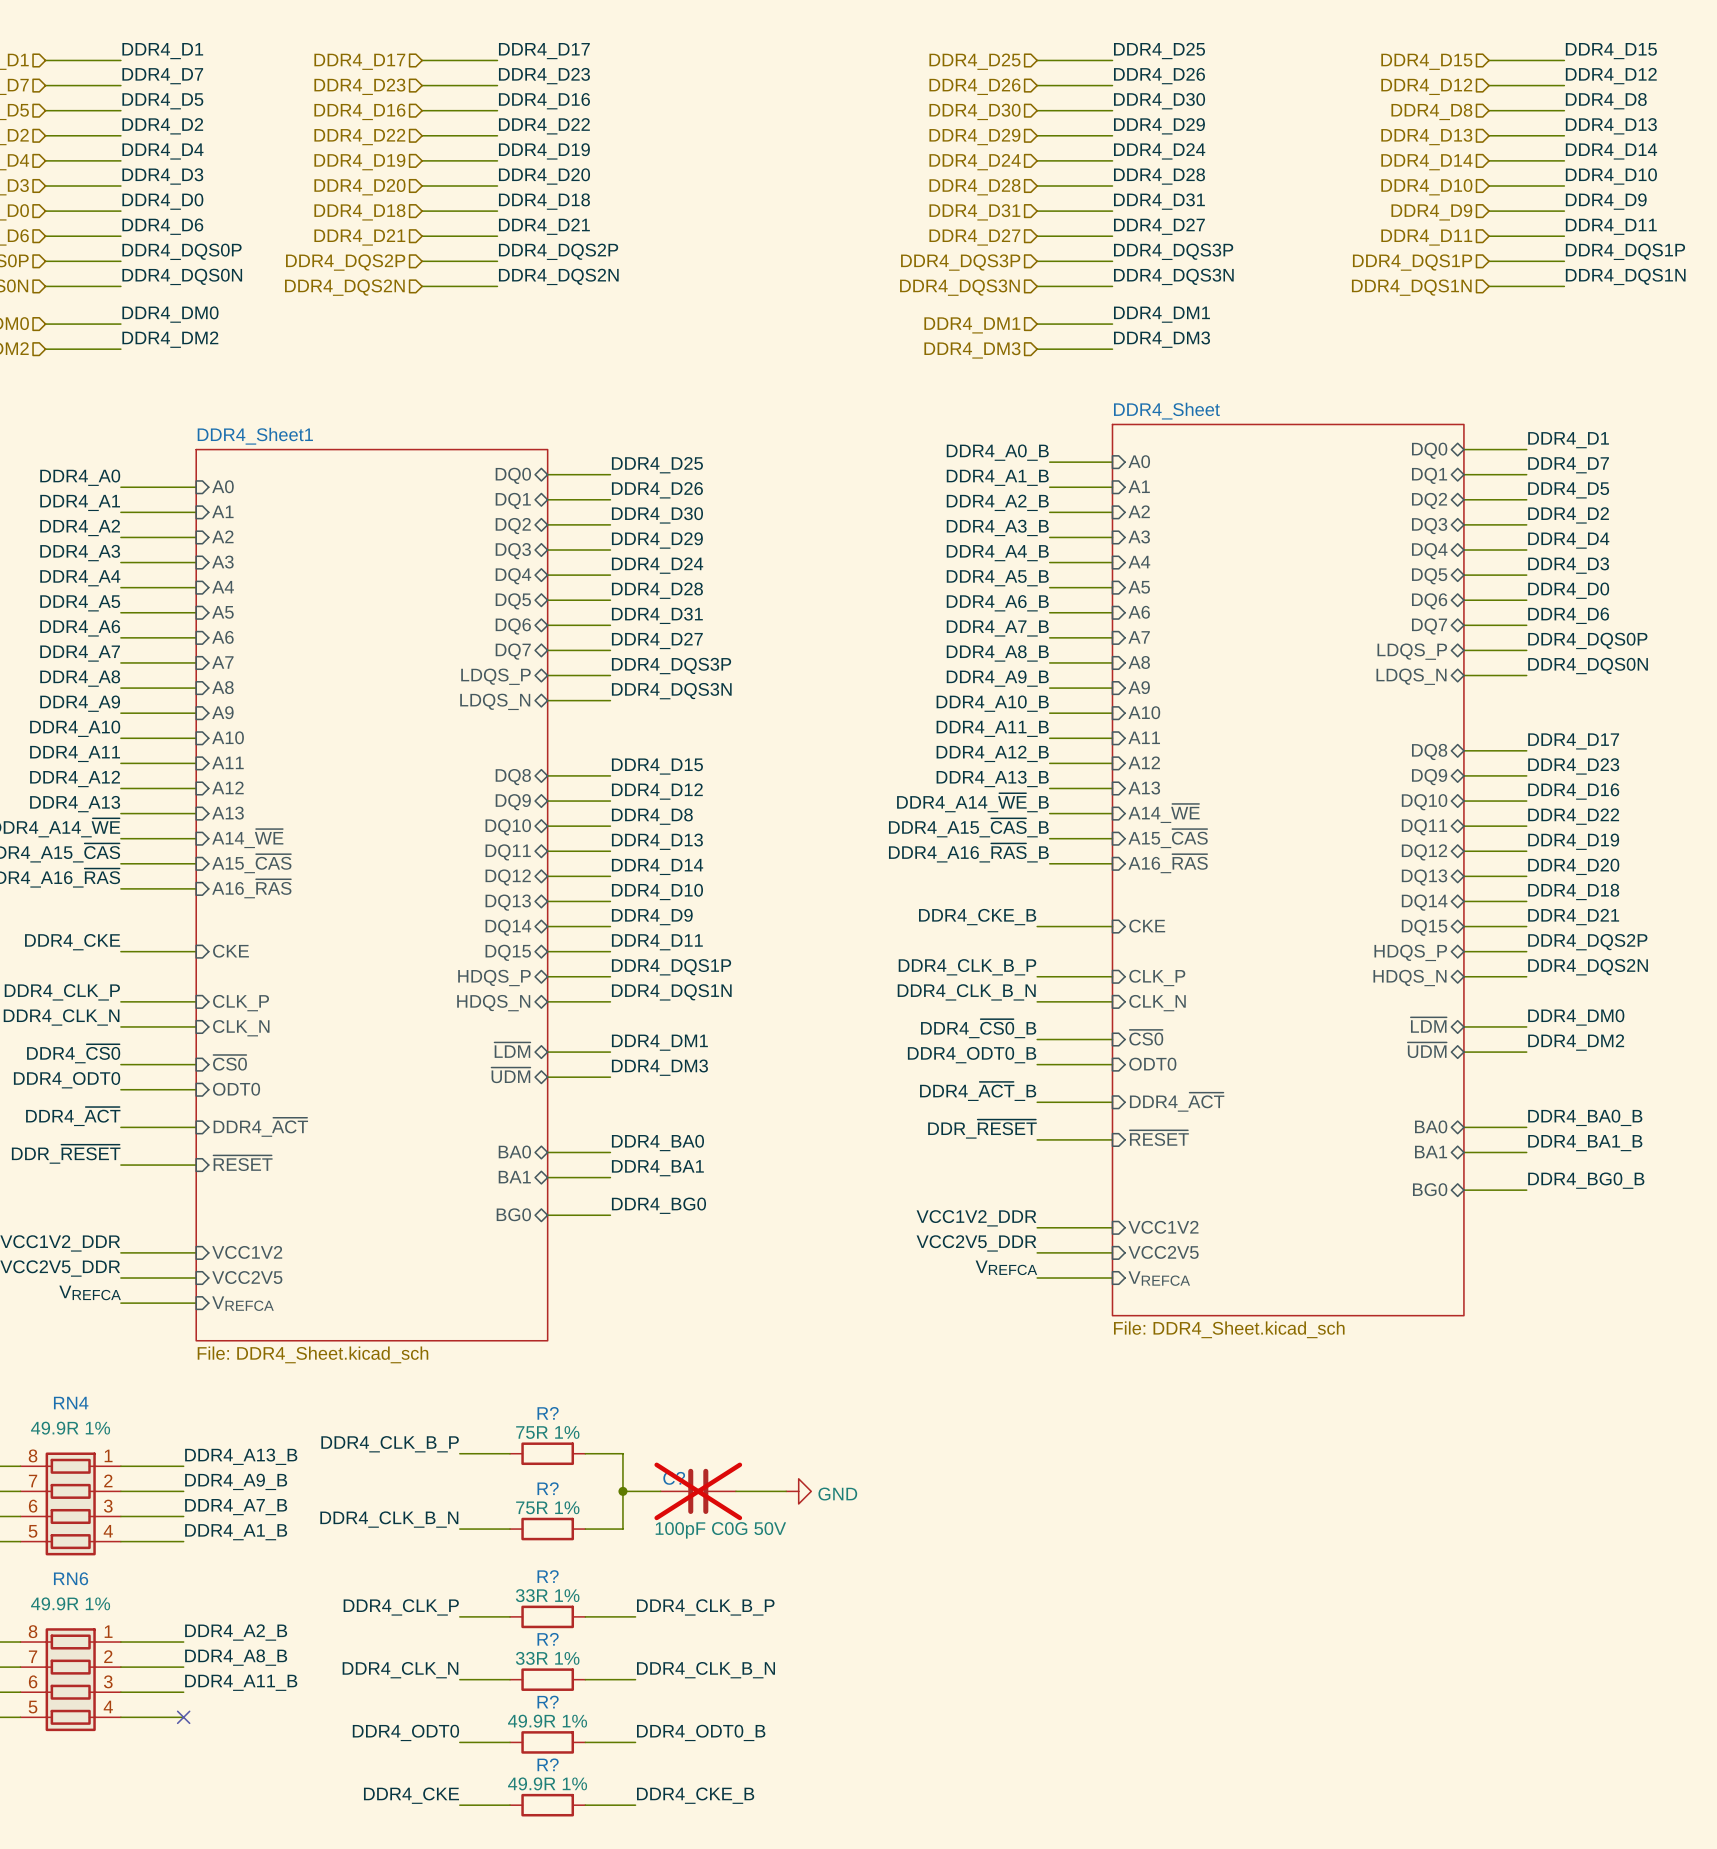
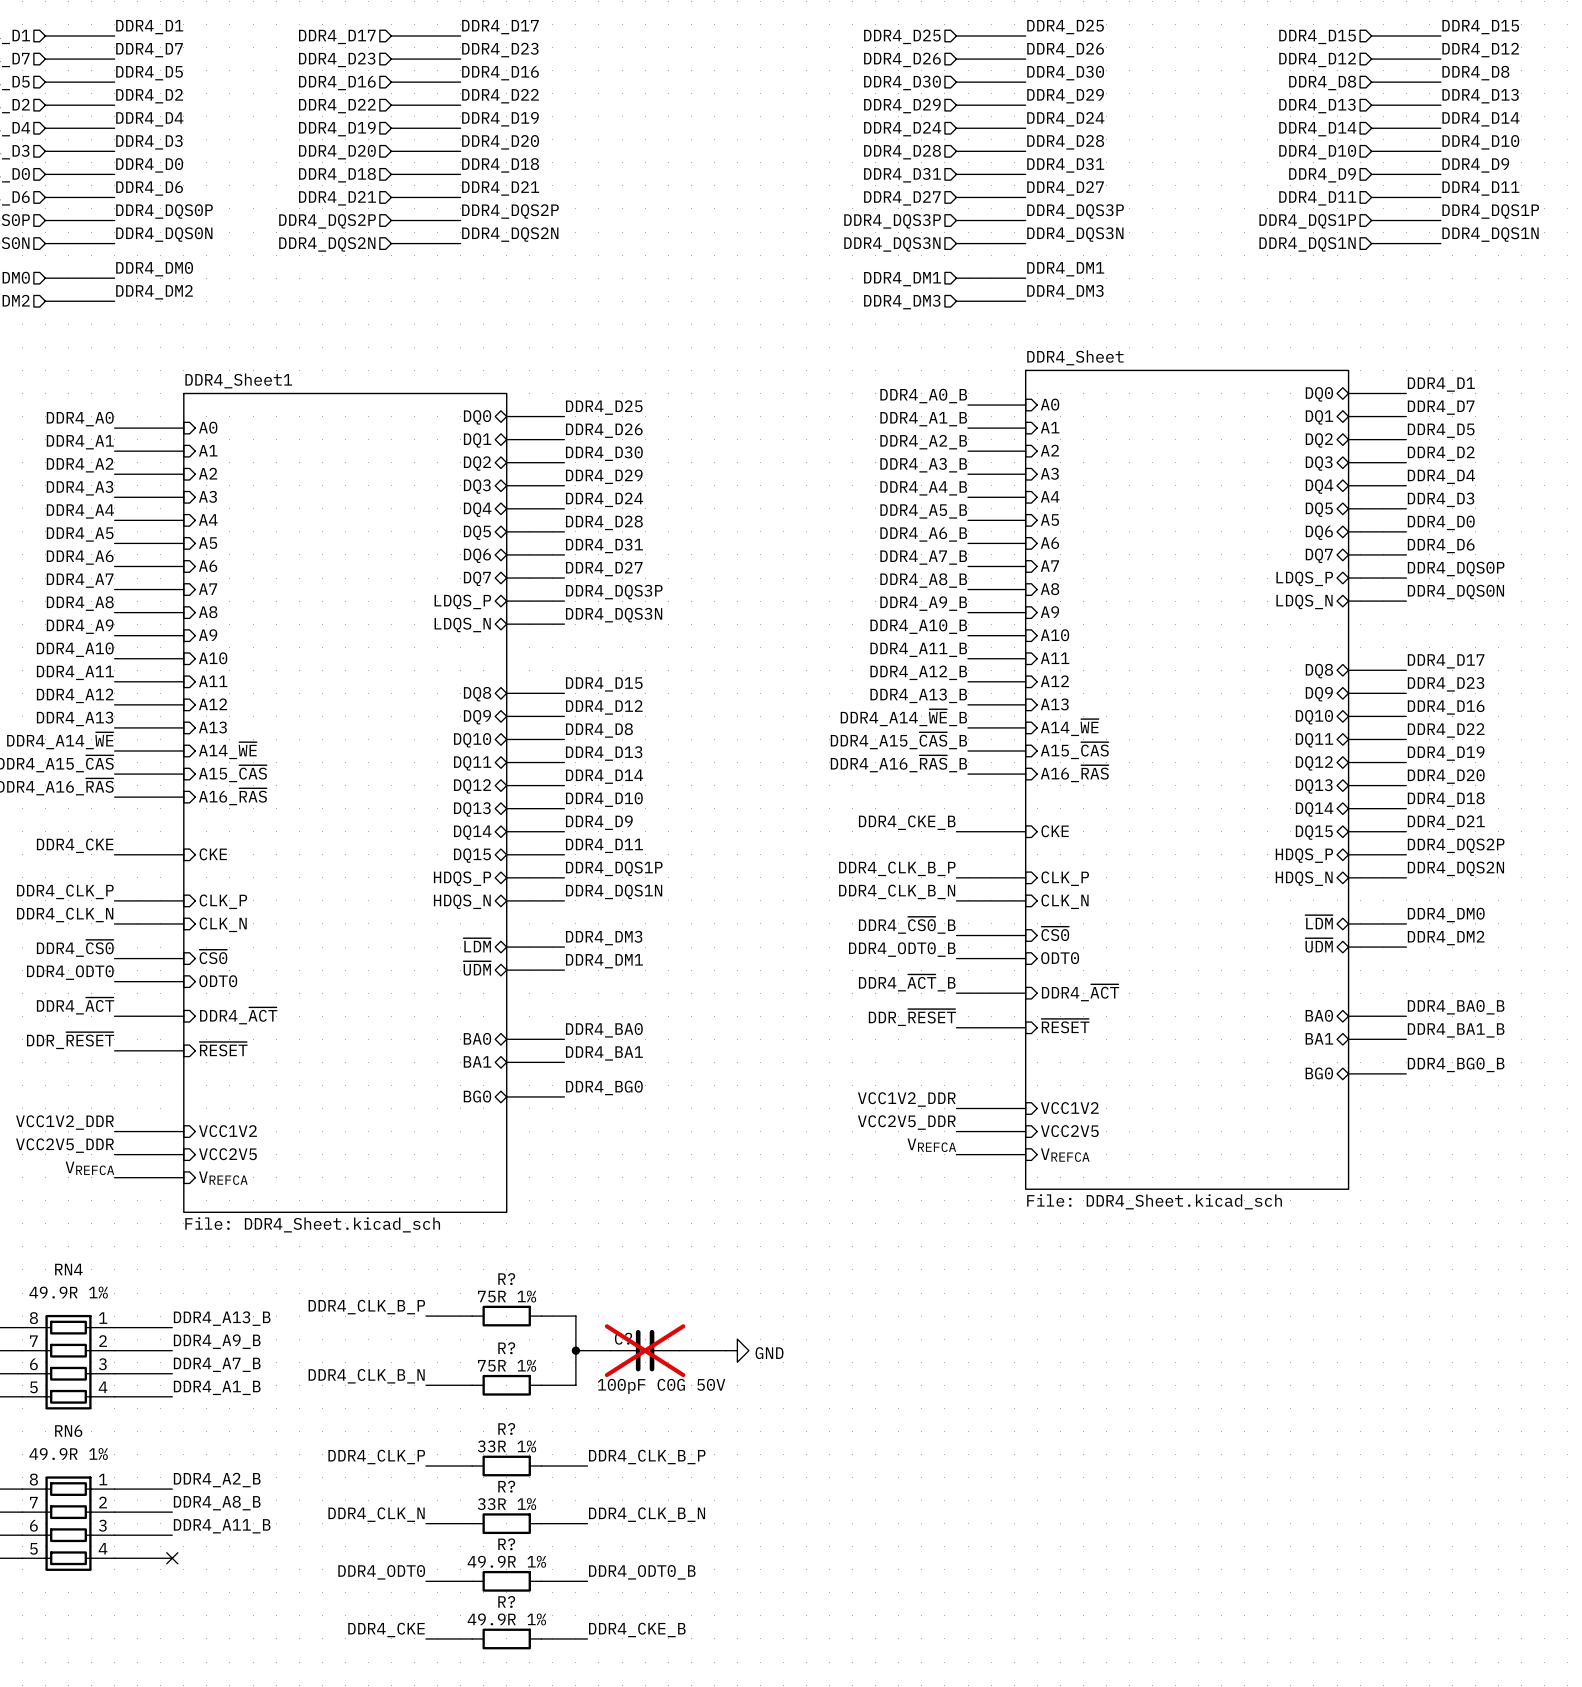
label: DDR4_DM1 (659, 1042) -> DDR4_DM3 (604, 938)
label: DDR4_DM3 (659, 1067) -> DDR4_DM1 (604, 961)

